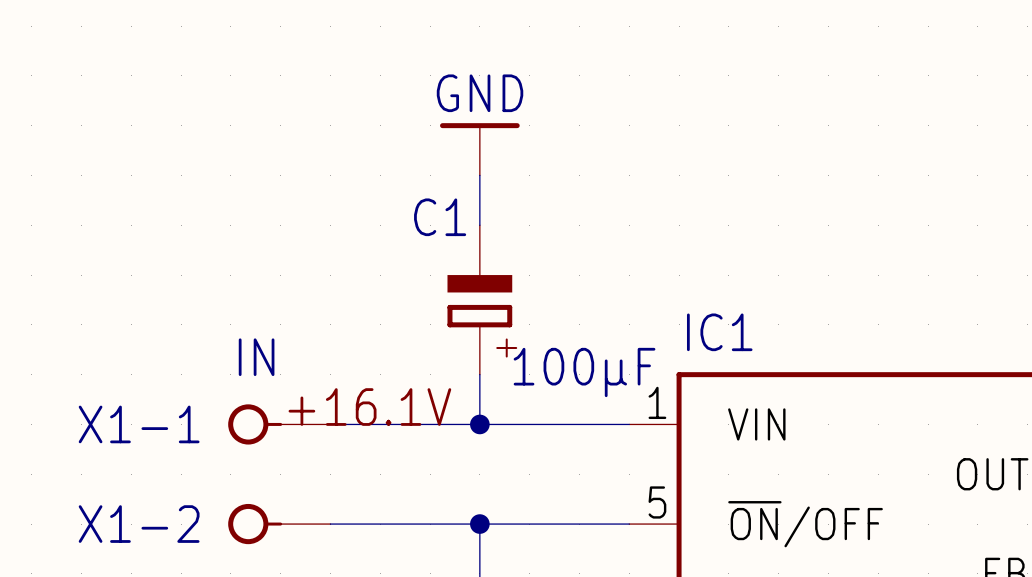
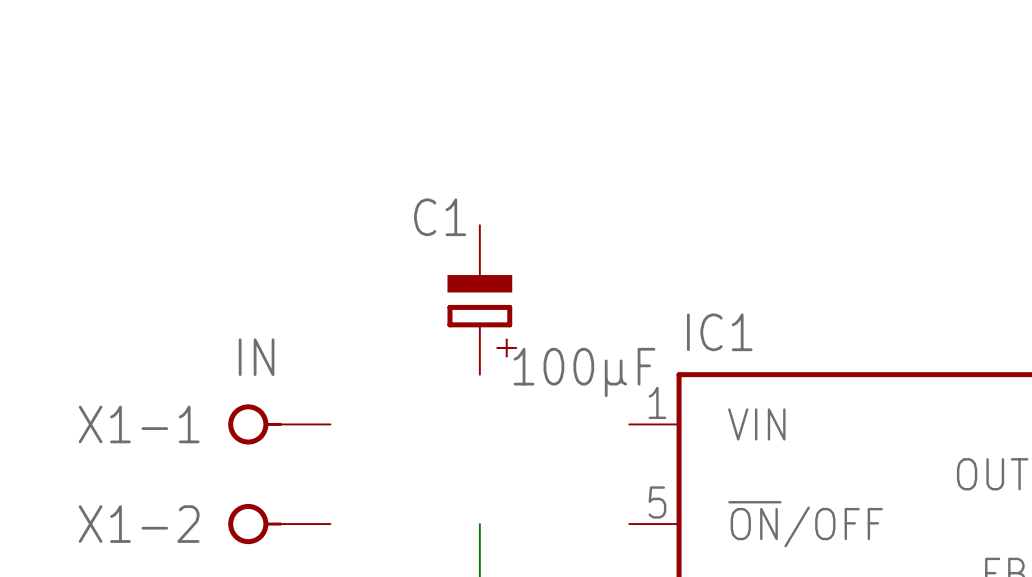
power symbol: GND (479, 149) -> none
wire: (479, 175) (479, 225) -> none
wire: (479, 374) (479, 424) -> none
label: +16.1V (369, 407) -> none
wire: (330, 424) (629, 424) -> none
junction: (479, 424) -> none
wire: (330, 524) (629, 524) -> none
junction: (479, 524) -> none

